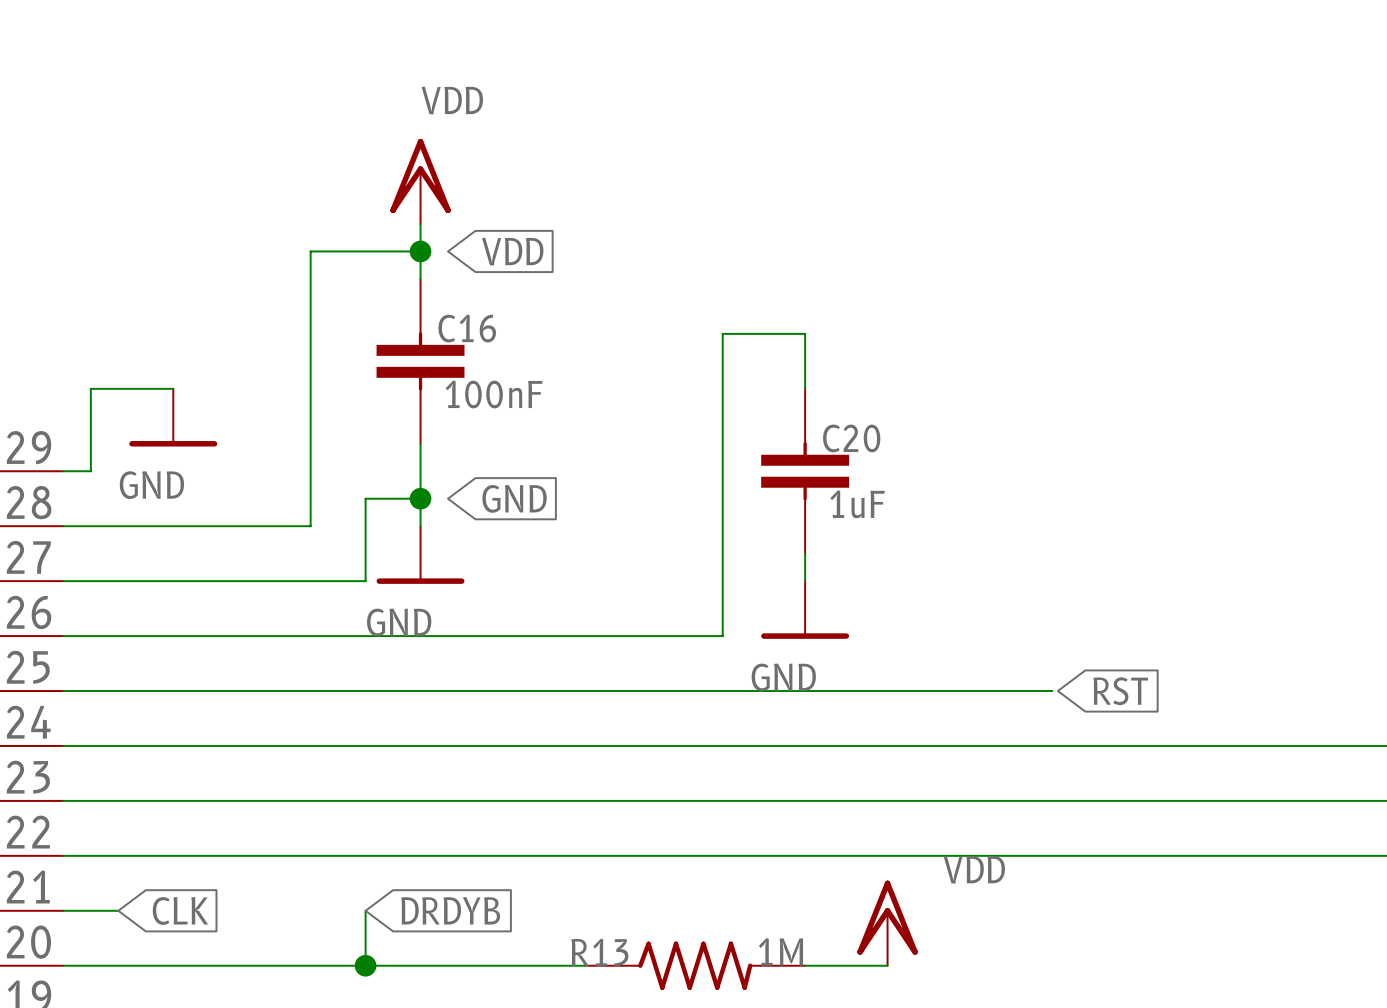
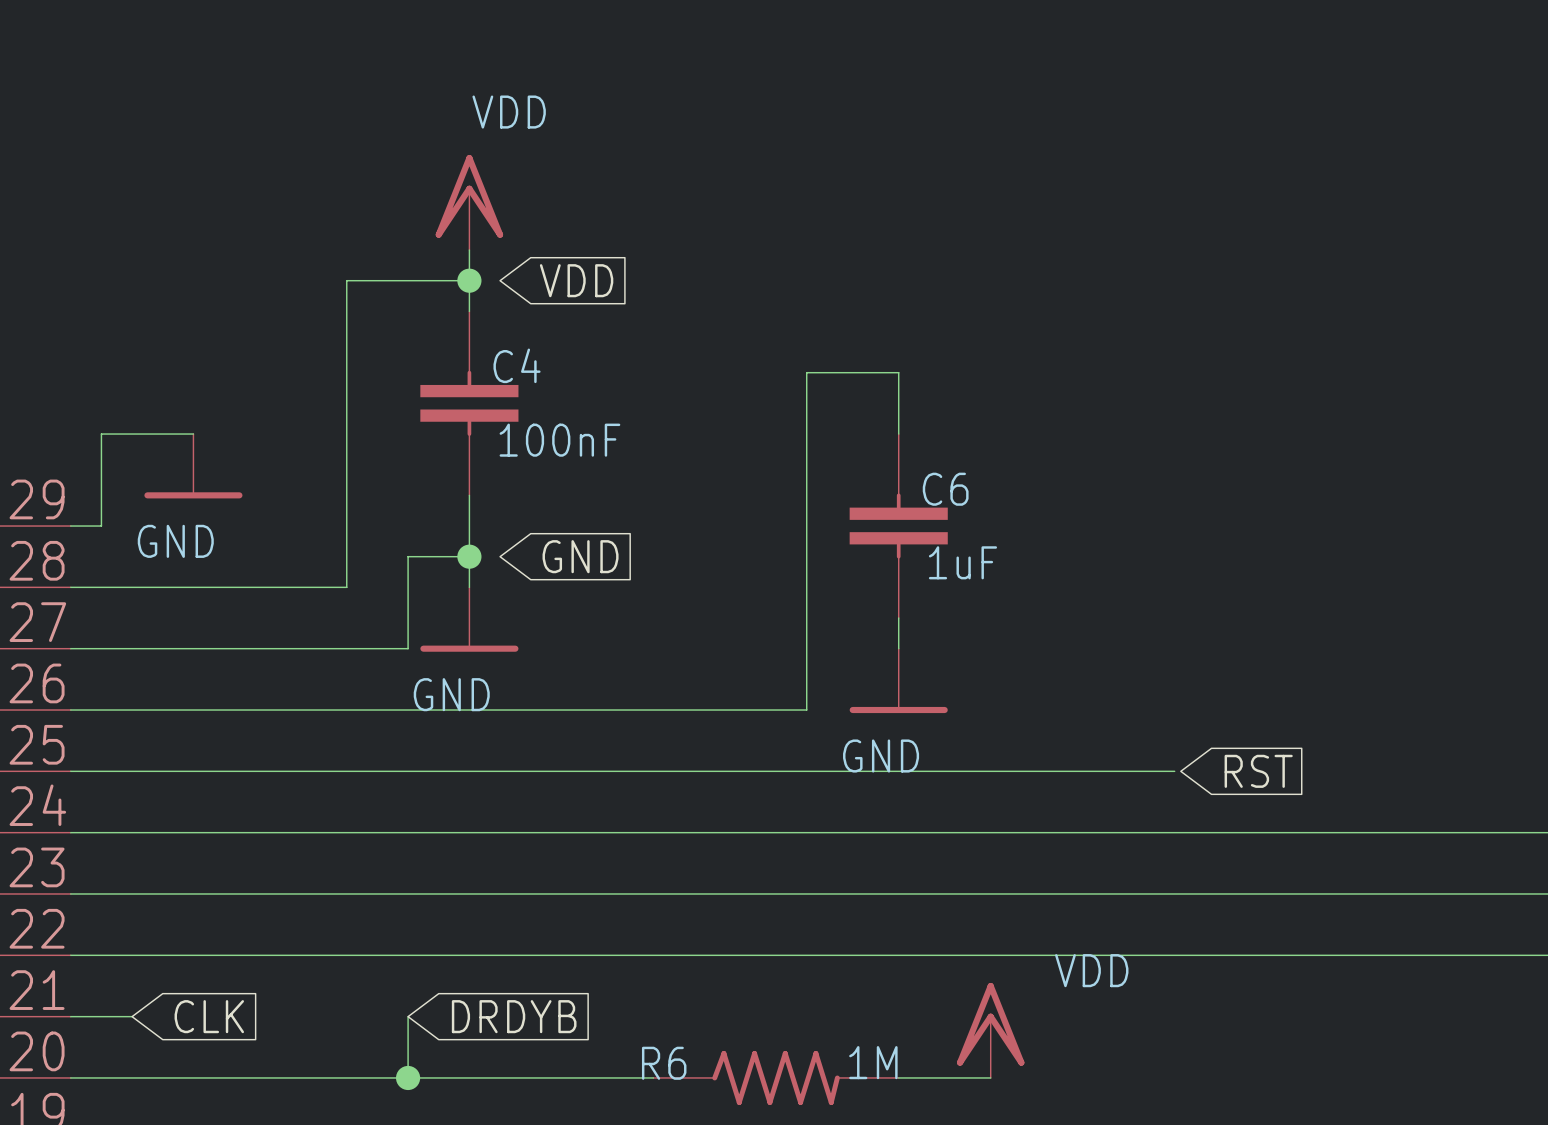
C16 name: C16 (467, 328) -> C4 (517, 365)
C20 name: C20 (851, 438) -> C6 (945, 489)
R13 name: R13 (599, 952) -> R6 (664, 1063)

